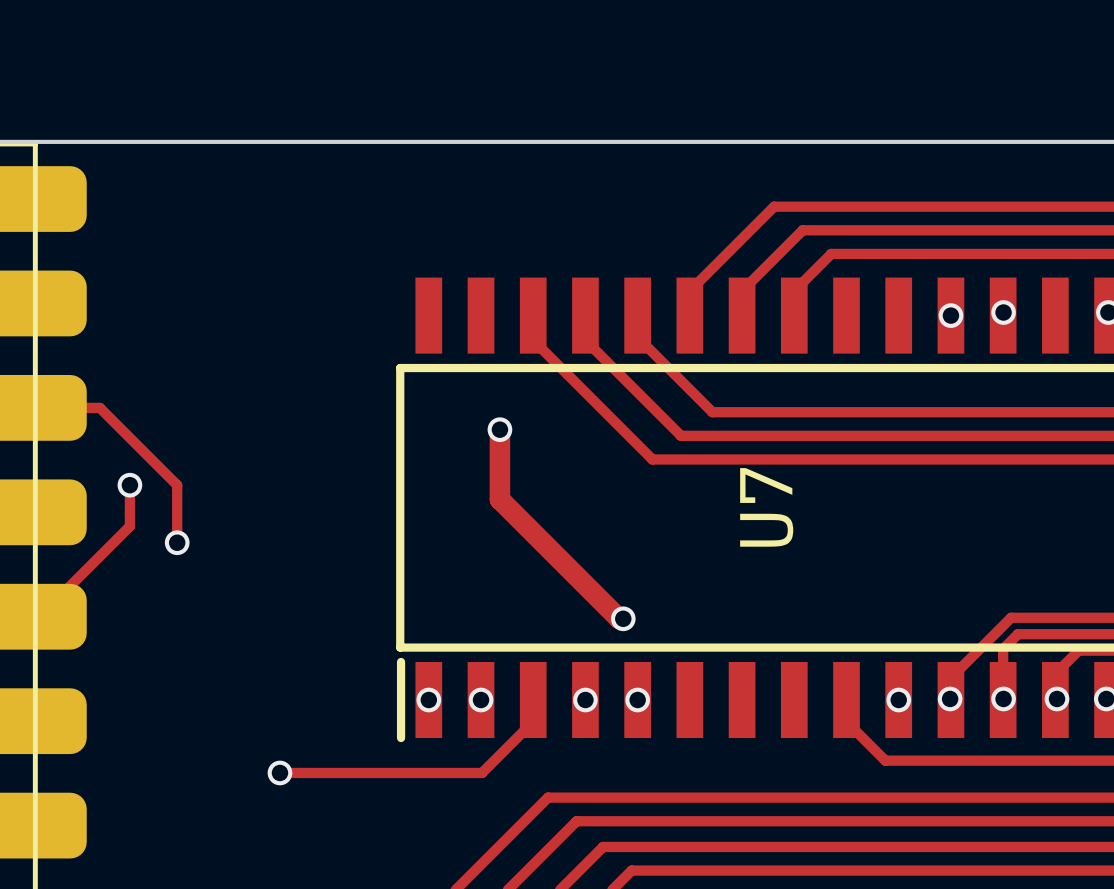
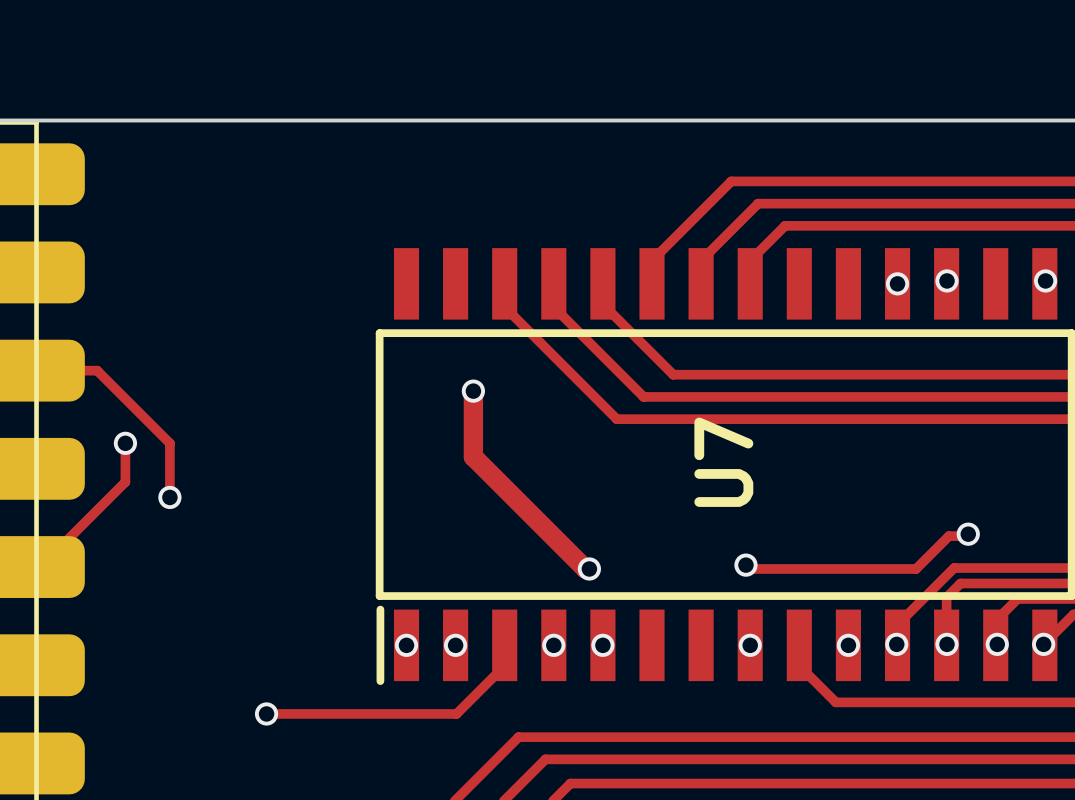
track: none -> (968, 534) (966, 536) (948, 536) (916, 568) (749, 568) (745, 565)
via: none -> (968, 534)
via: none -> (745, 565)
via: none -> (750, 645)

